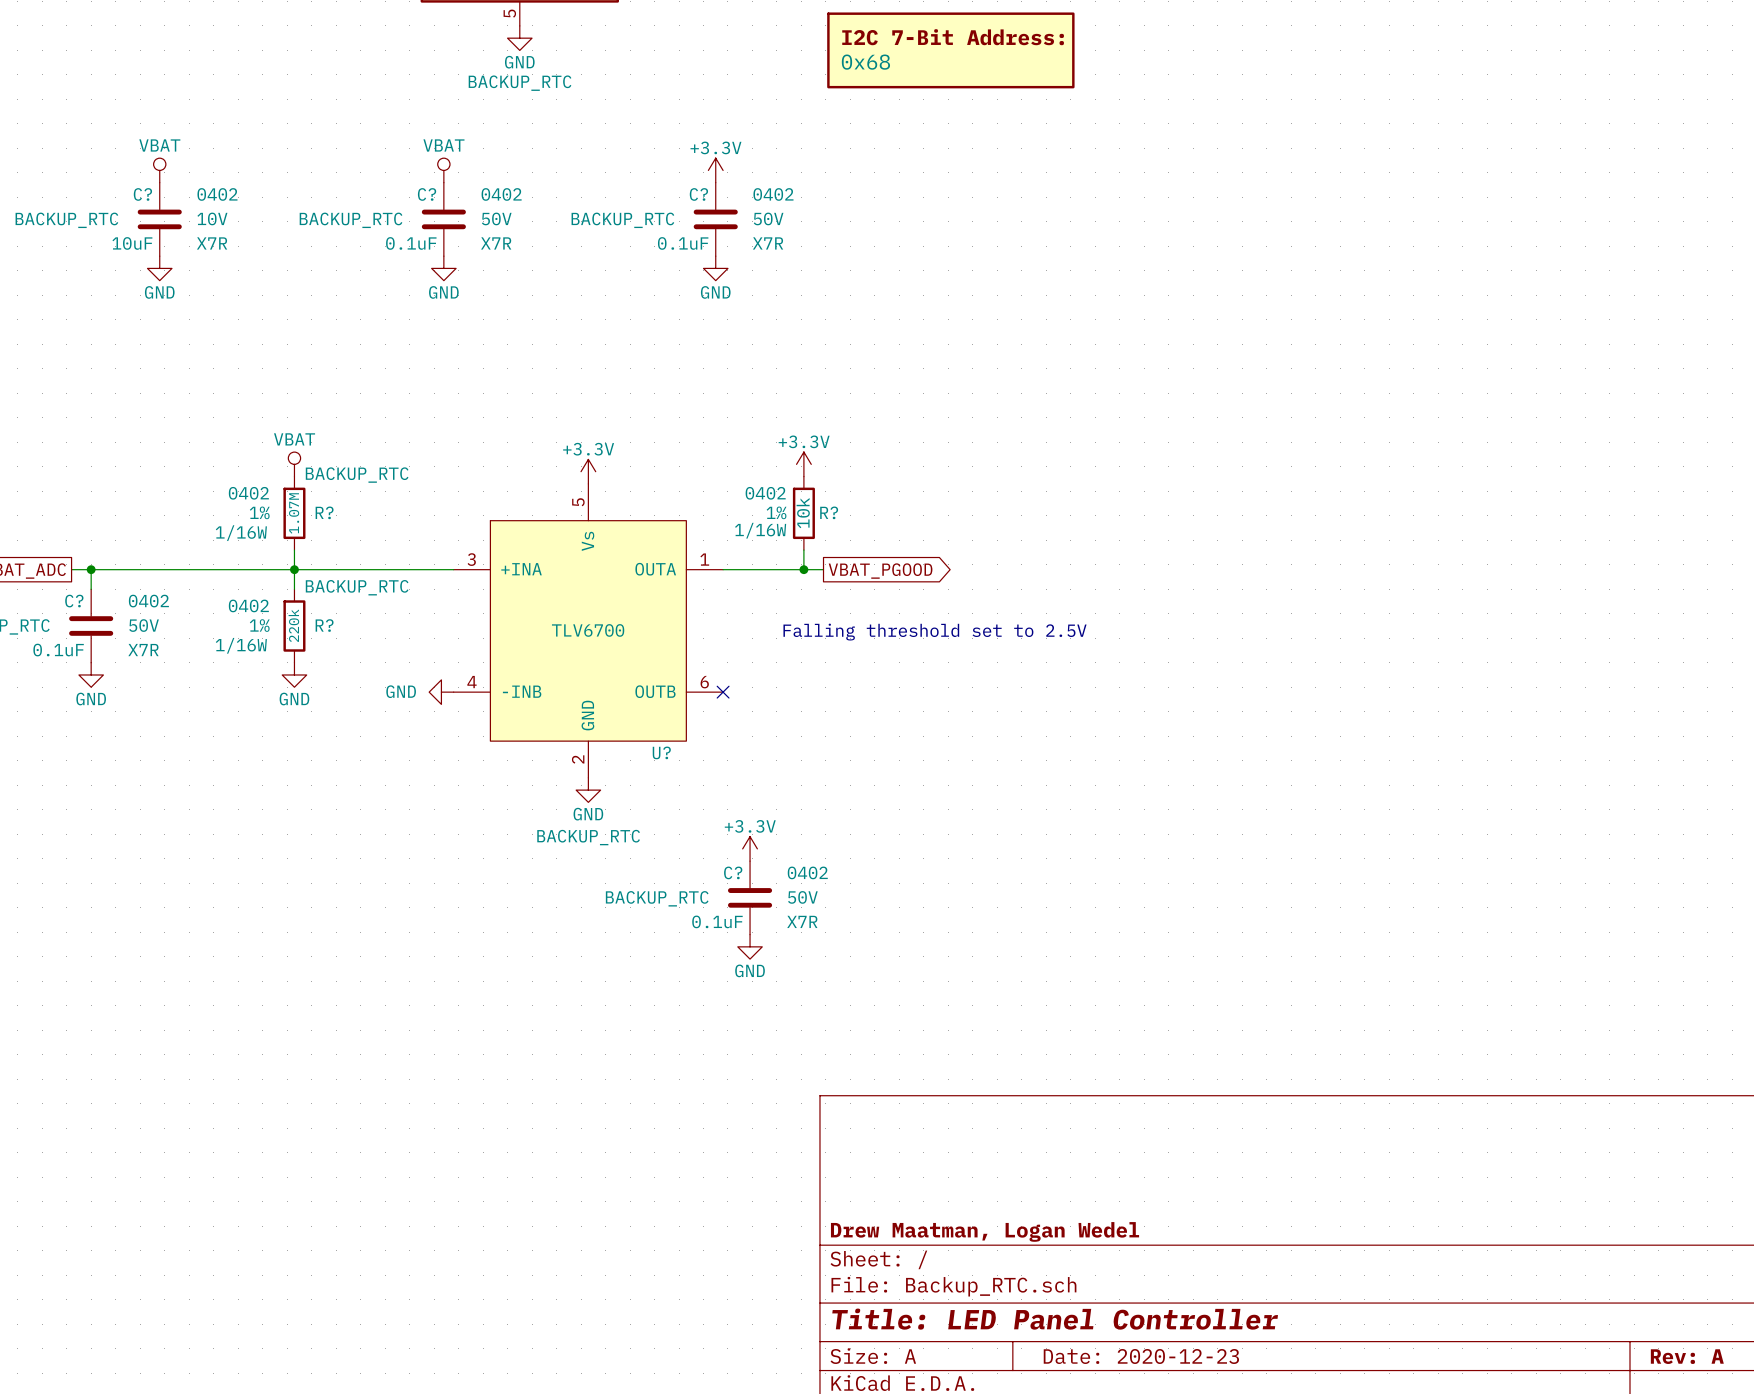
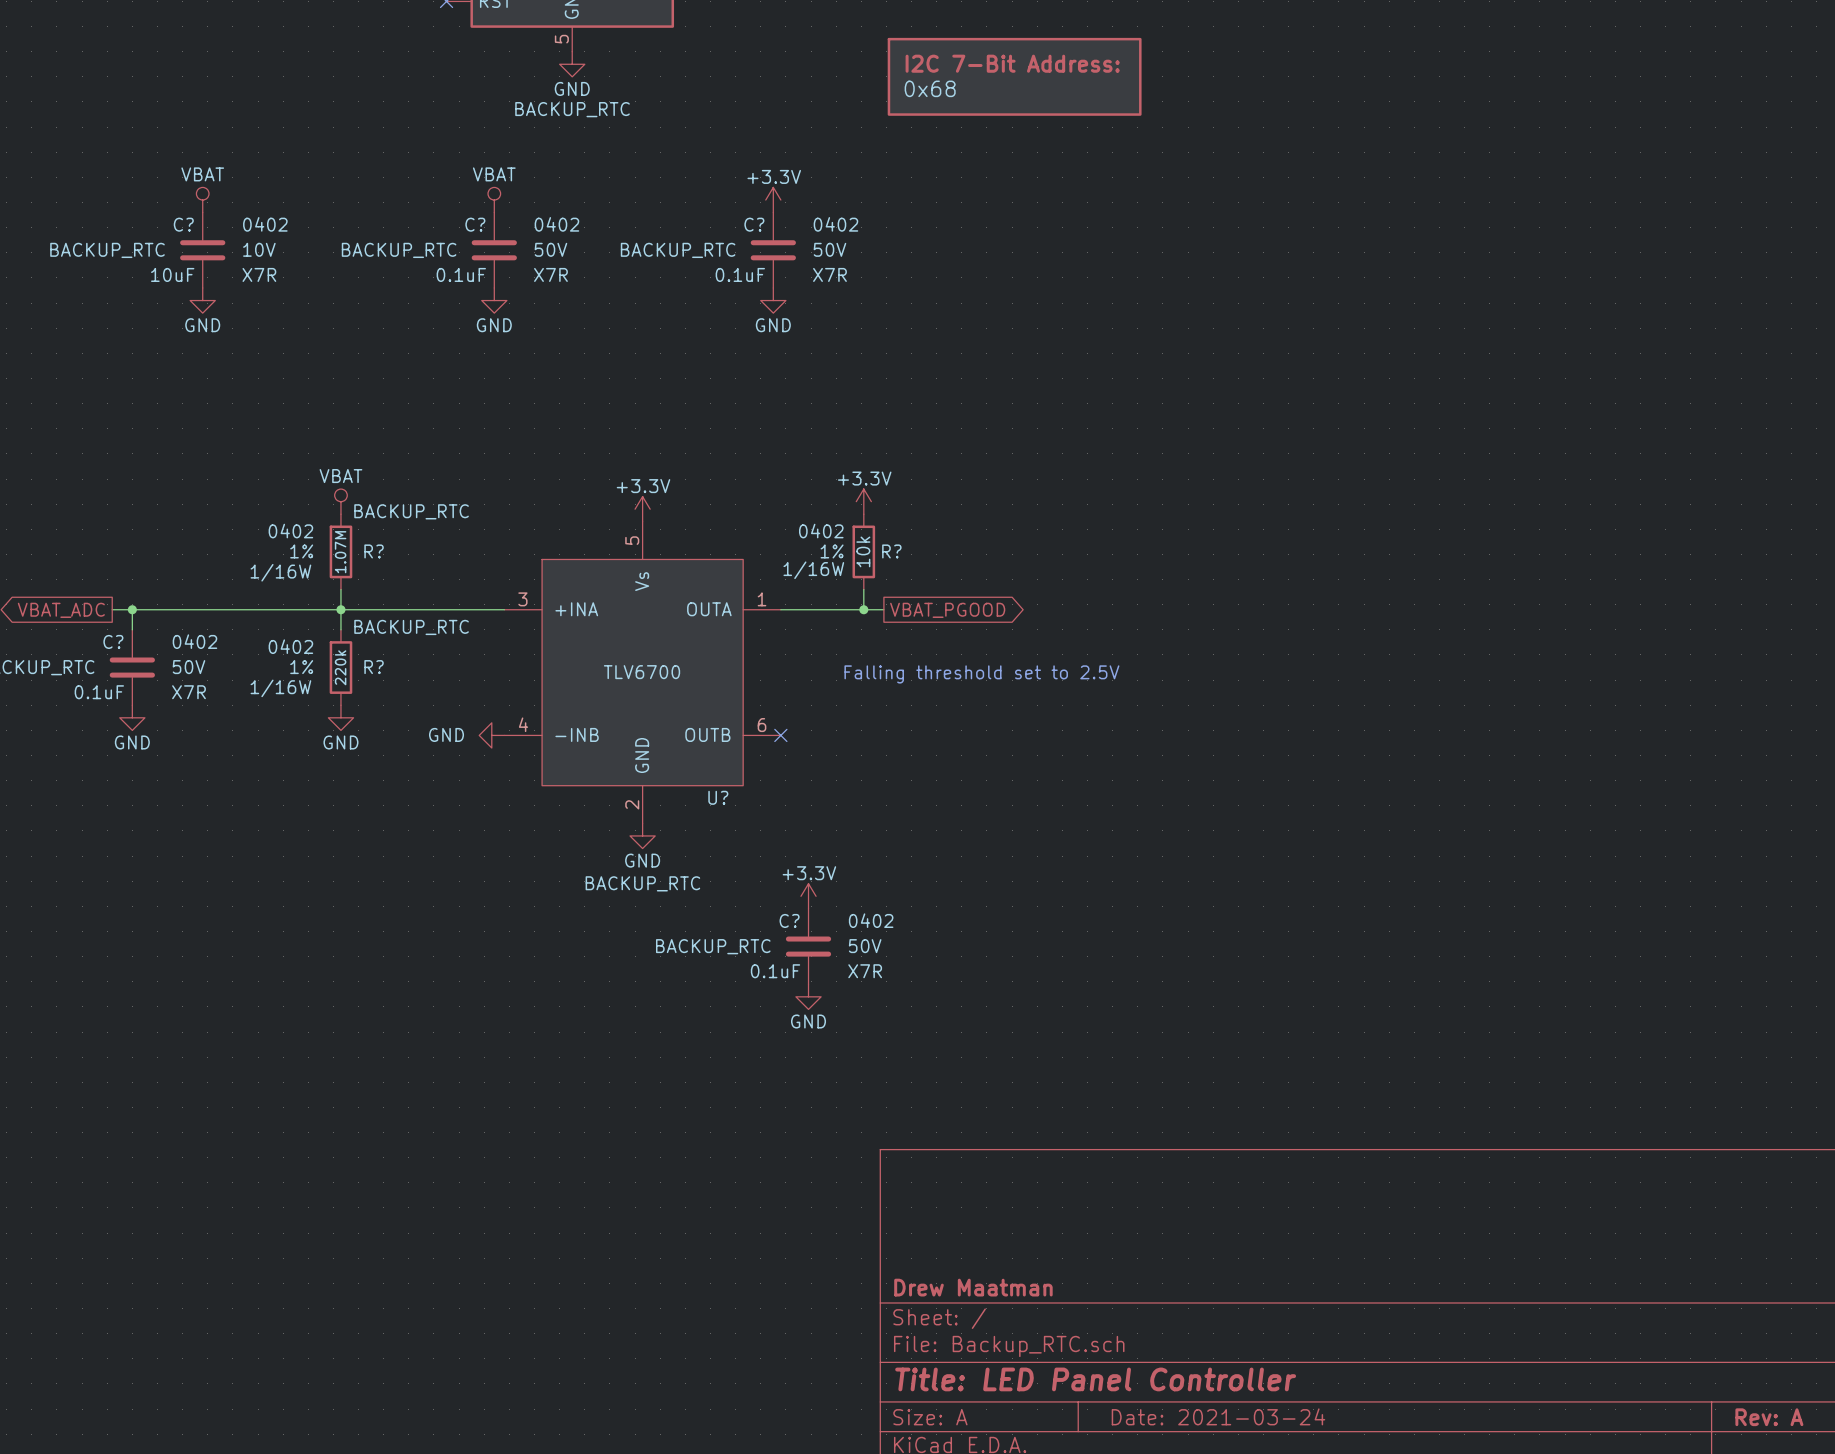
title block: Drew Maatman, Logan Wedel (985, 1231) -> Drew Maatman (973, 1287)
title block: Date: 2020-12-23 (1141, 1356) -> Date: 2021-03-24 (1218, 1416)

